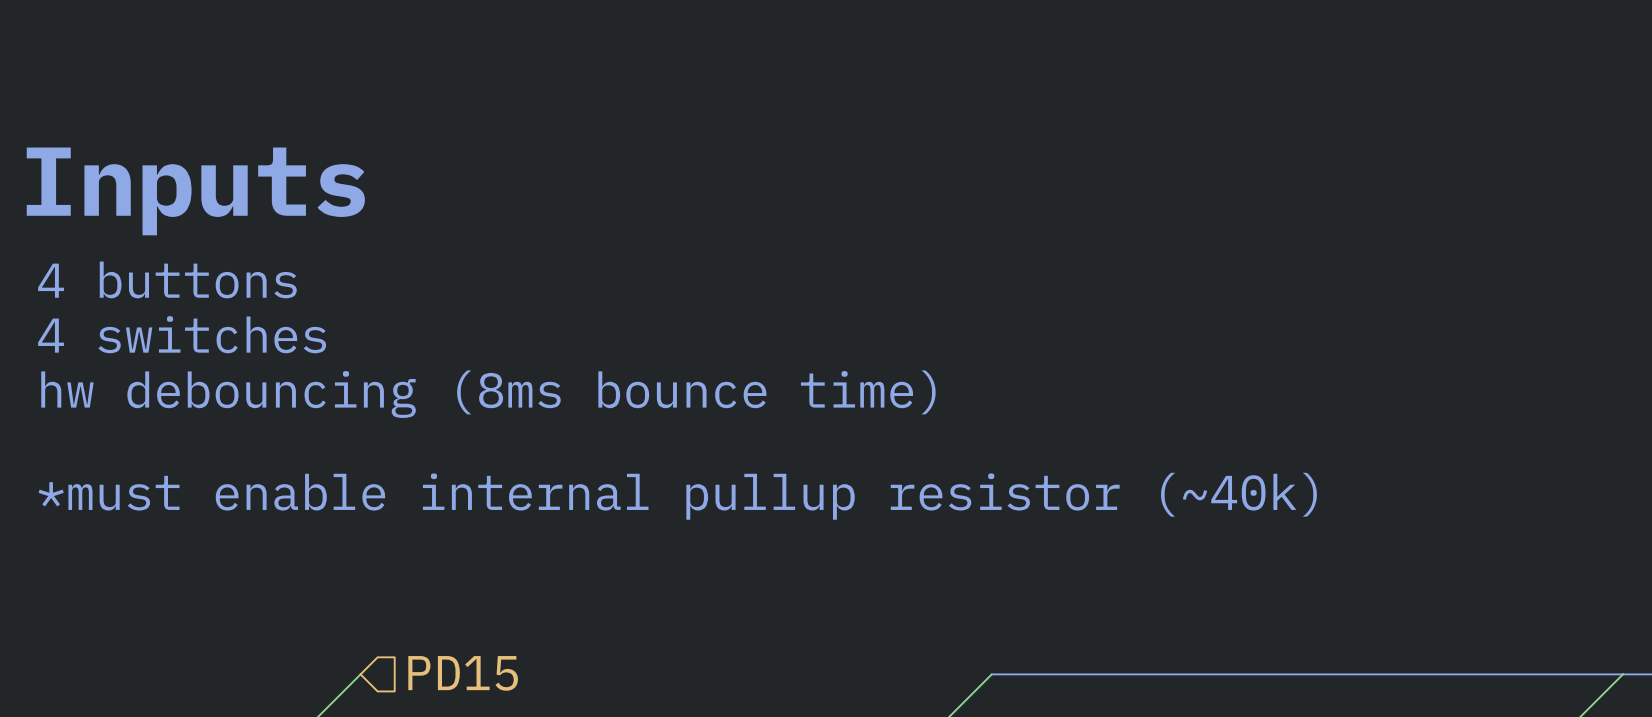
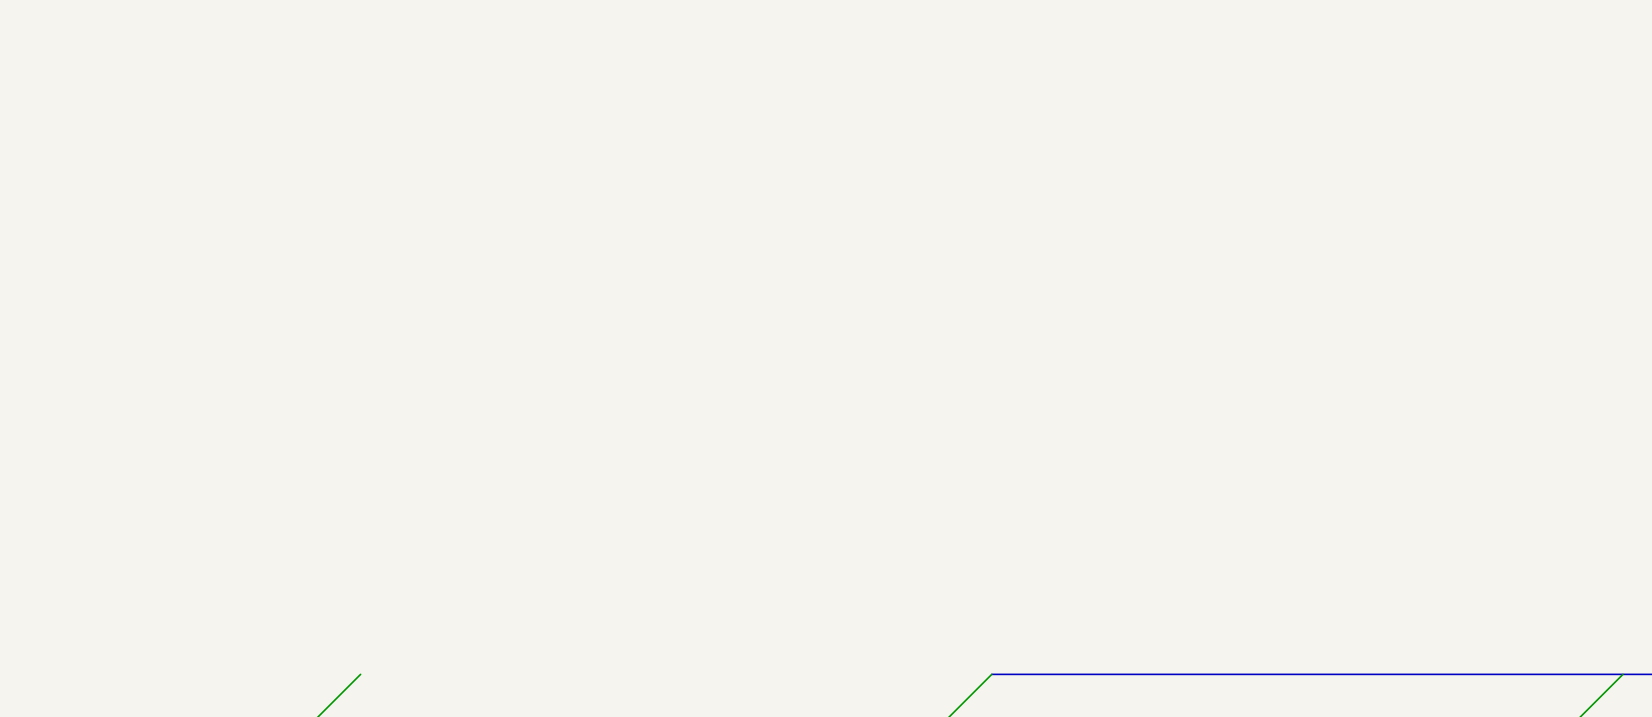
text: Inputs (195, 191) -> none
text: 4 buttons (167, 279) -> none
text: 4 switches (182, 334) -> none
text: hw debouncing (8ms bounce time) (488, 394) -> none
text: *must enable internal pullup resistor (~40k) (677, 496) -> none
hierarchical label: PD15 (463, 673) -> none

